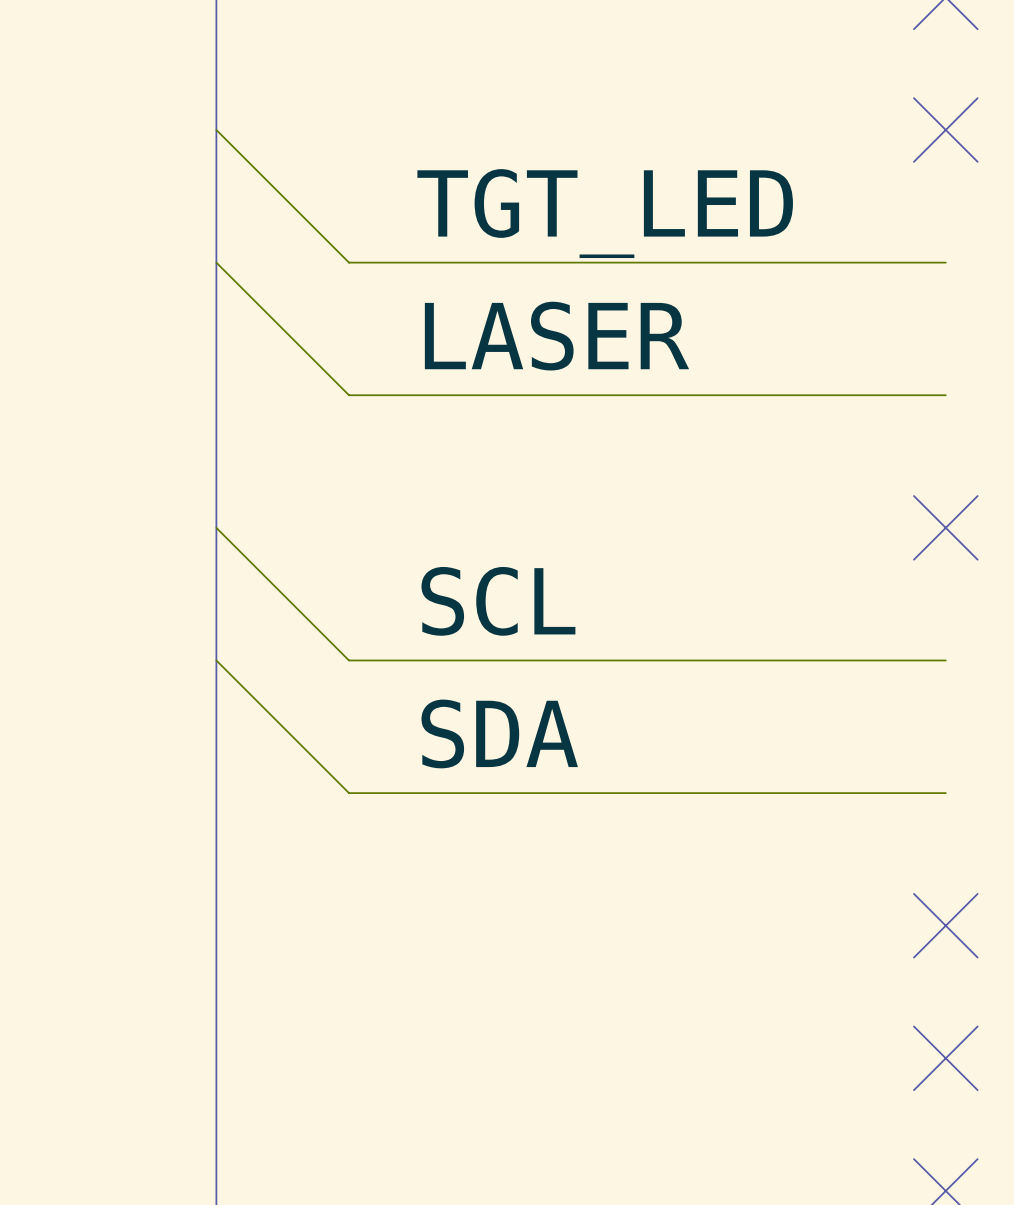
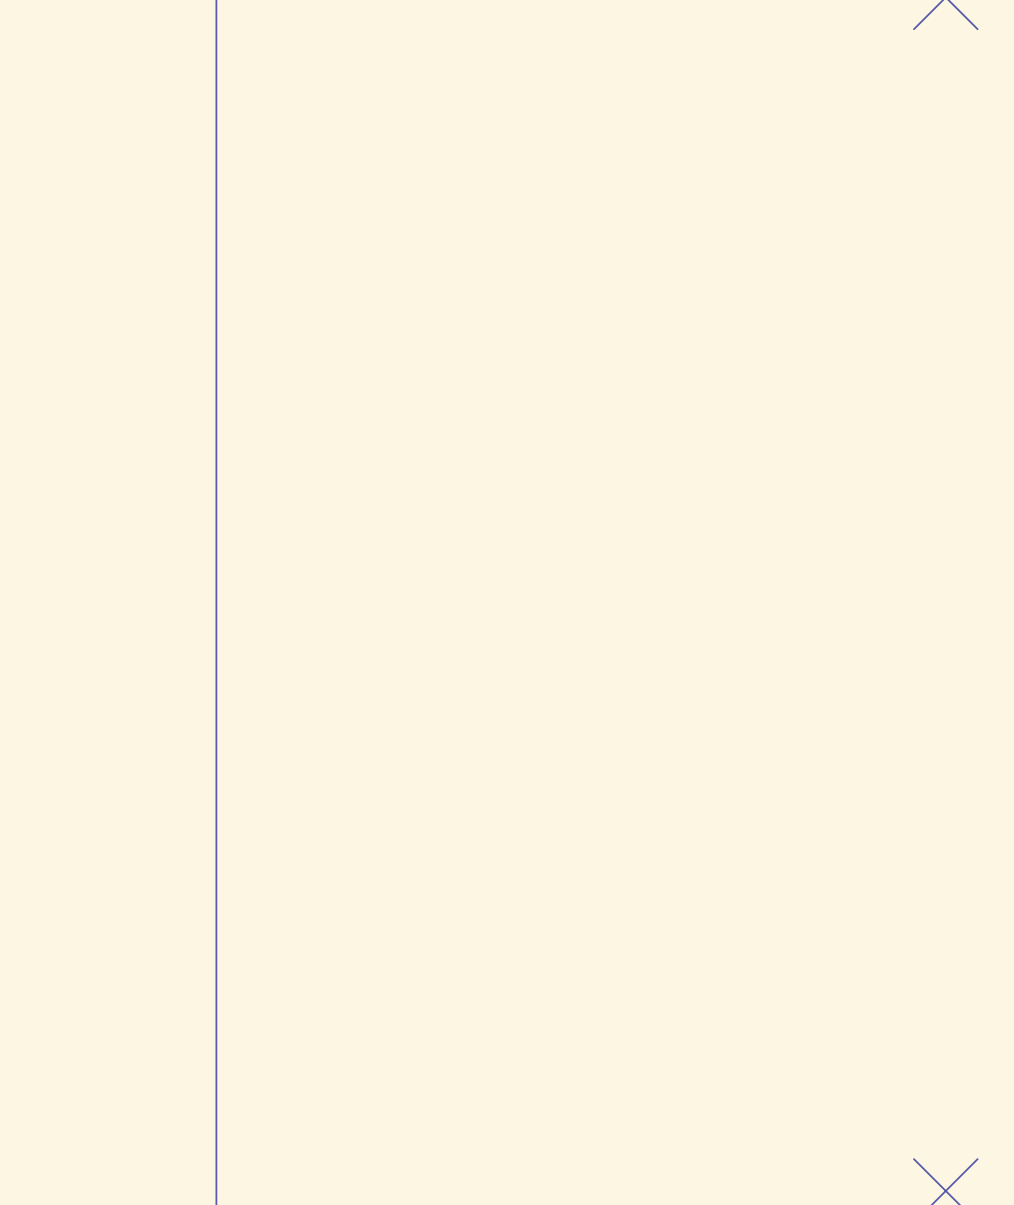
wire: (216, 129) (349, 262) (945, 262) -> none
no-connect mark: (945, 129) -> none
label: TGT_LED (605, 213) -> none
wire: (216, 262) (349, 395) (945, 395) -> none
label: LASER (556, 336) -> none
wire: (216, 527) (349, 660) (945, 660) -> none
no-connect mark: (945, 527) -> none
label: SCL (498, 601) -> none
wire: (216, 660) (349, 793) (945, 793) -> none
label: SDA (499, 733) -> none
no-connect mark: (945, 925) -> none
no-connect mark: (945, 1058) -> none

